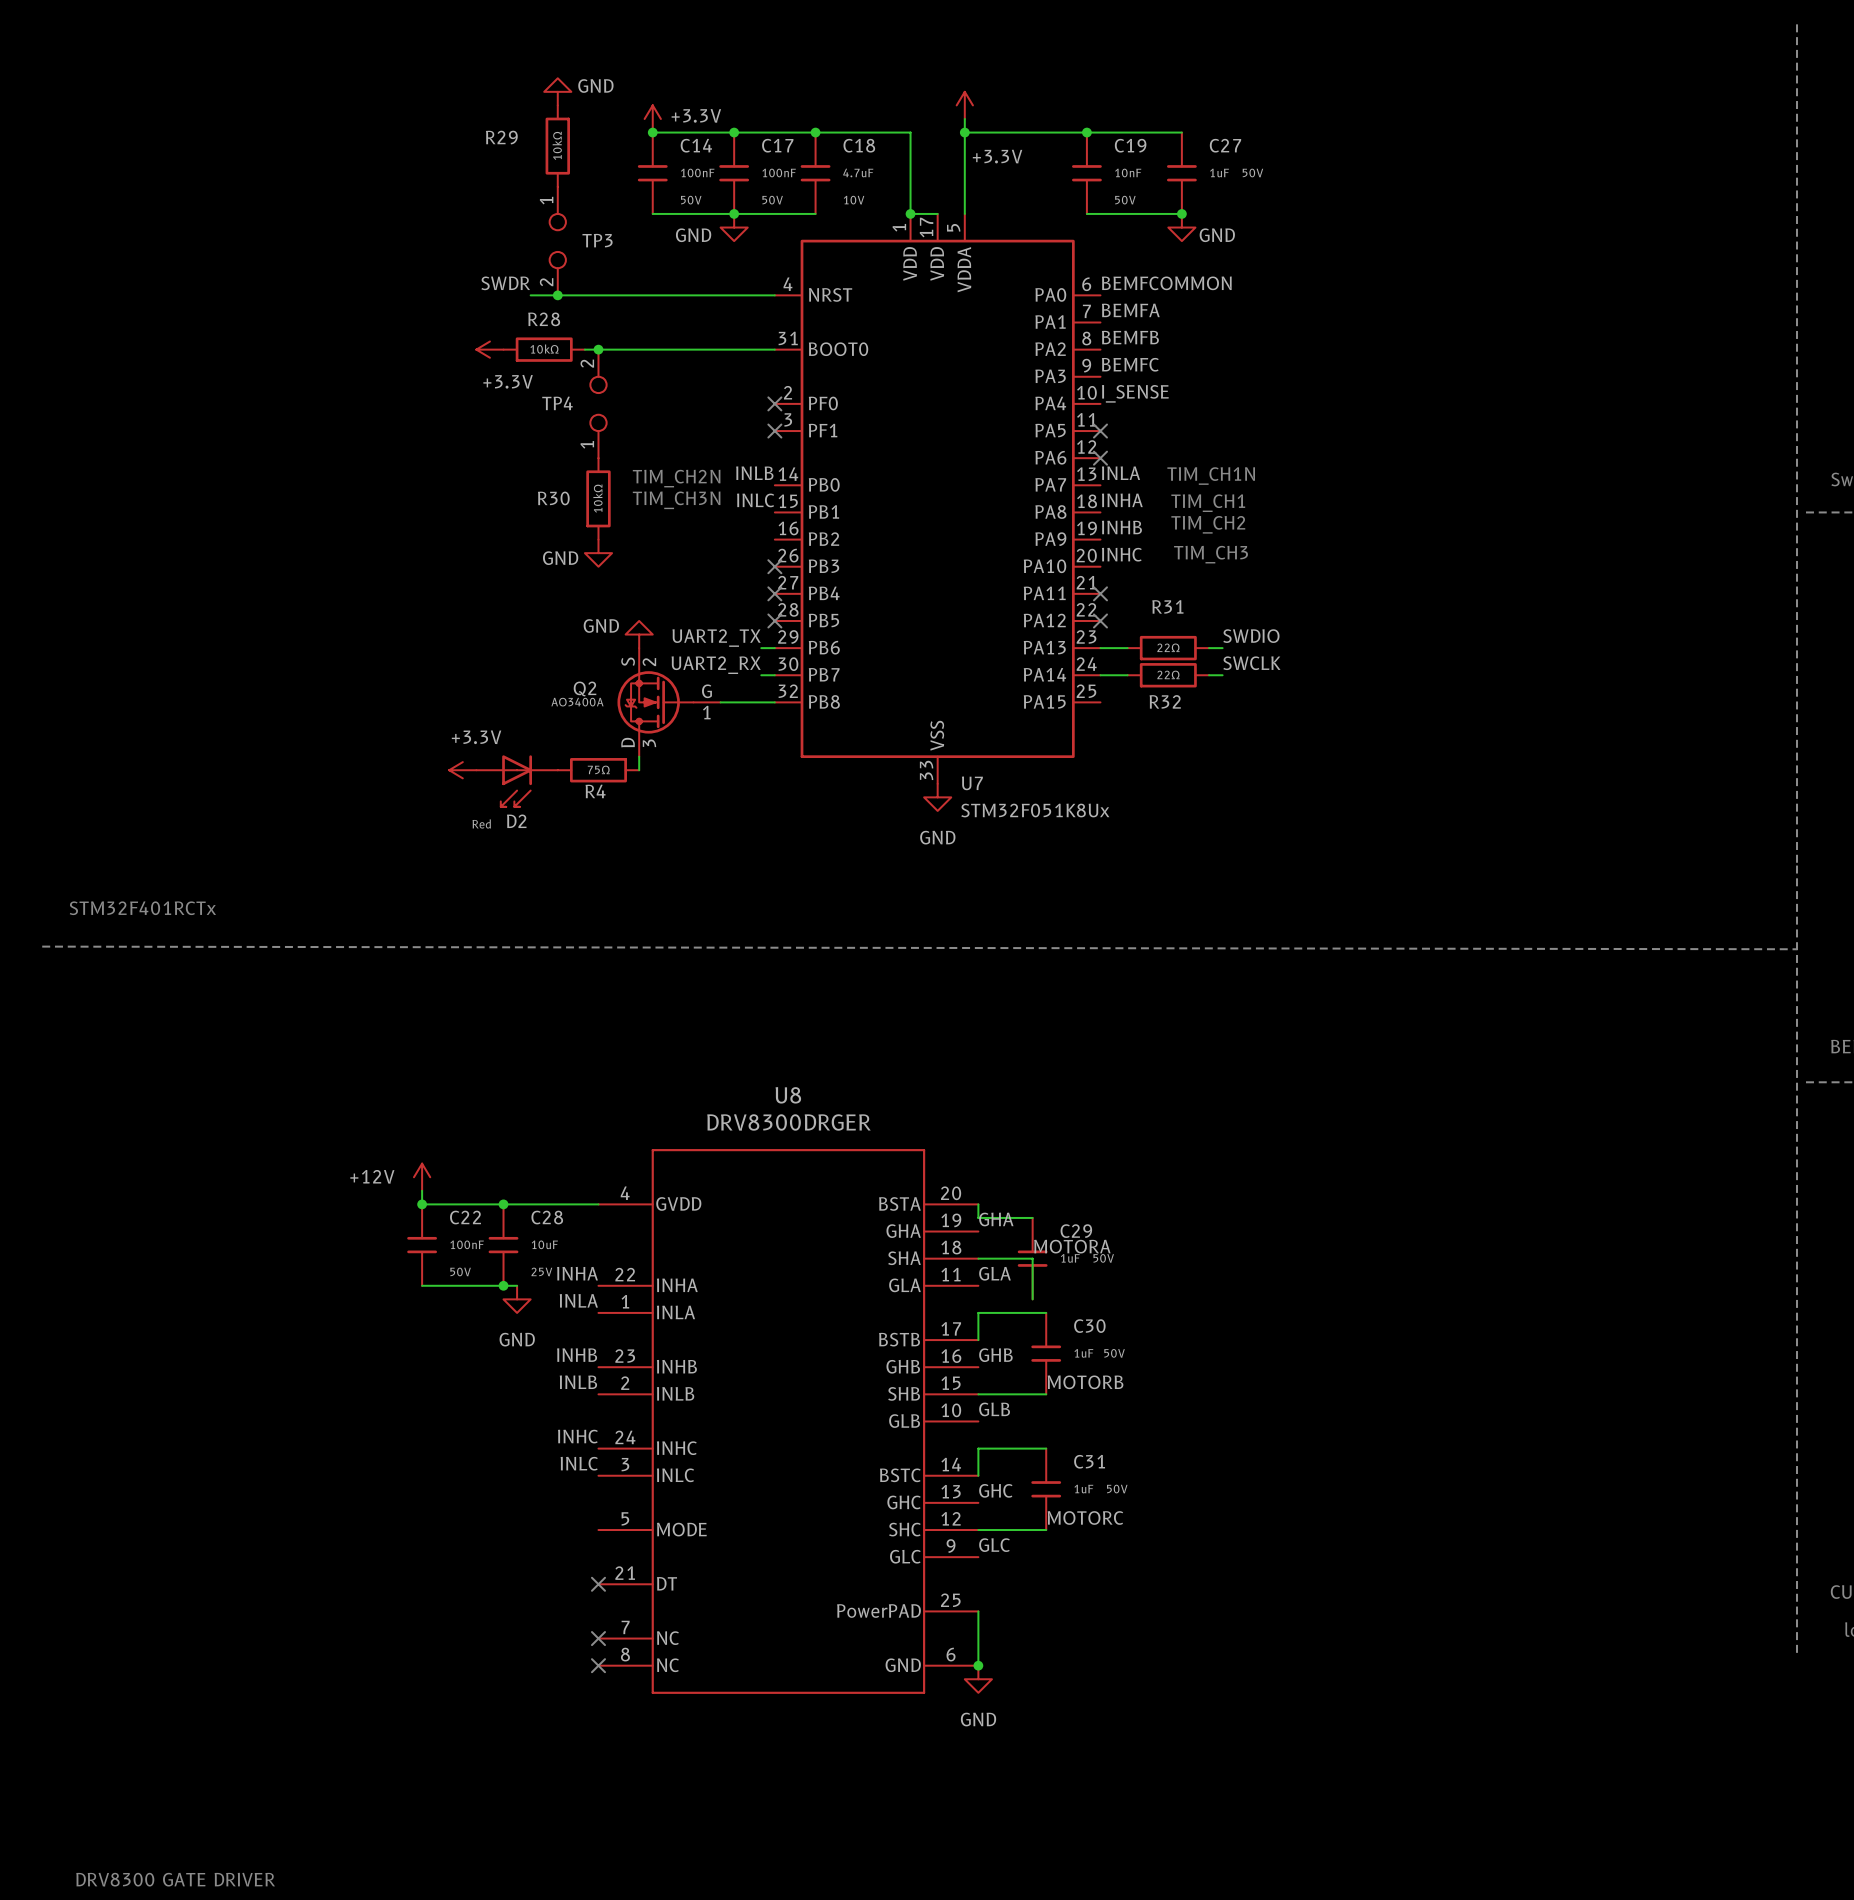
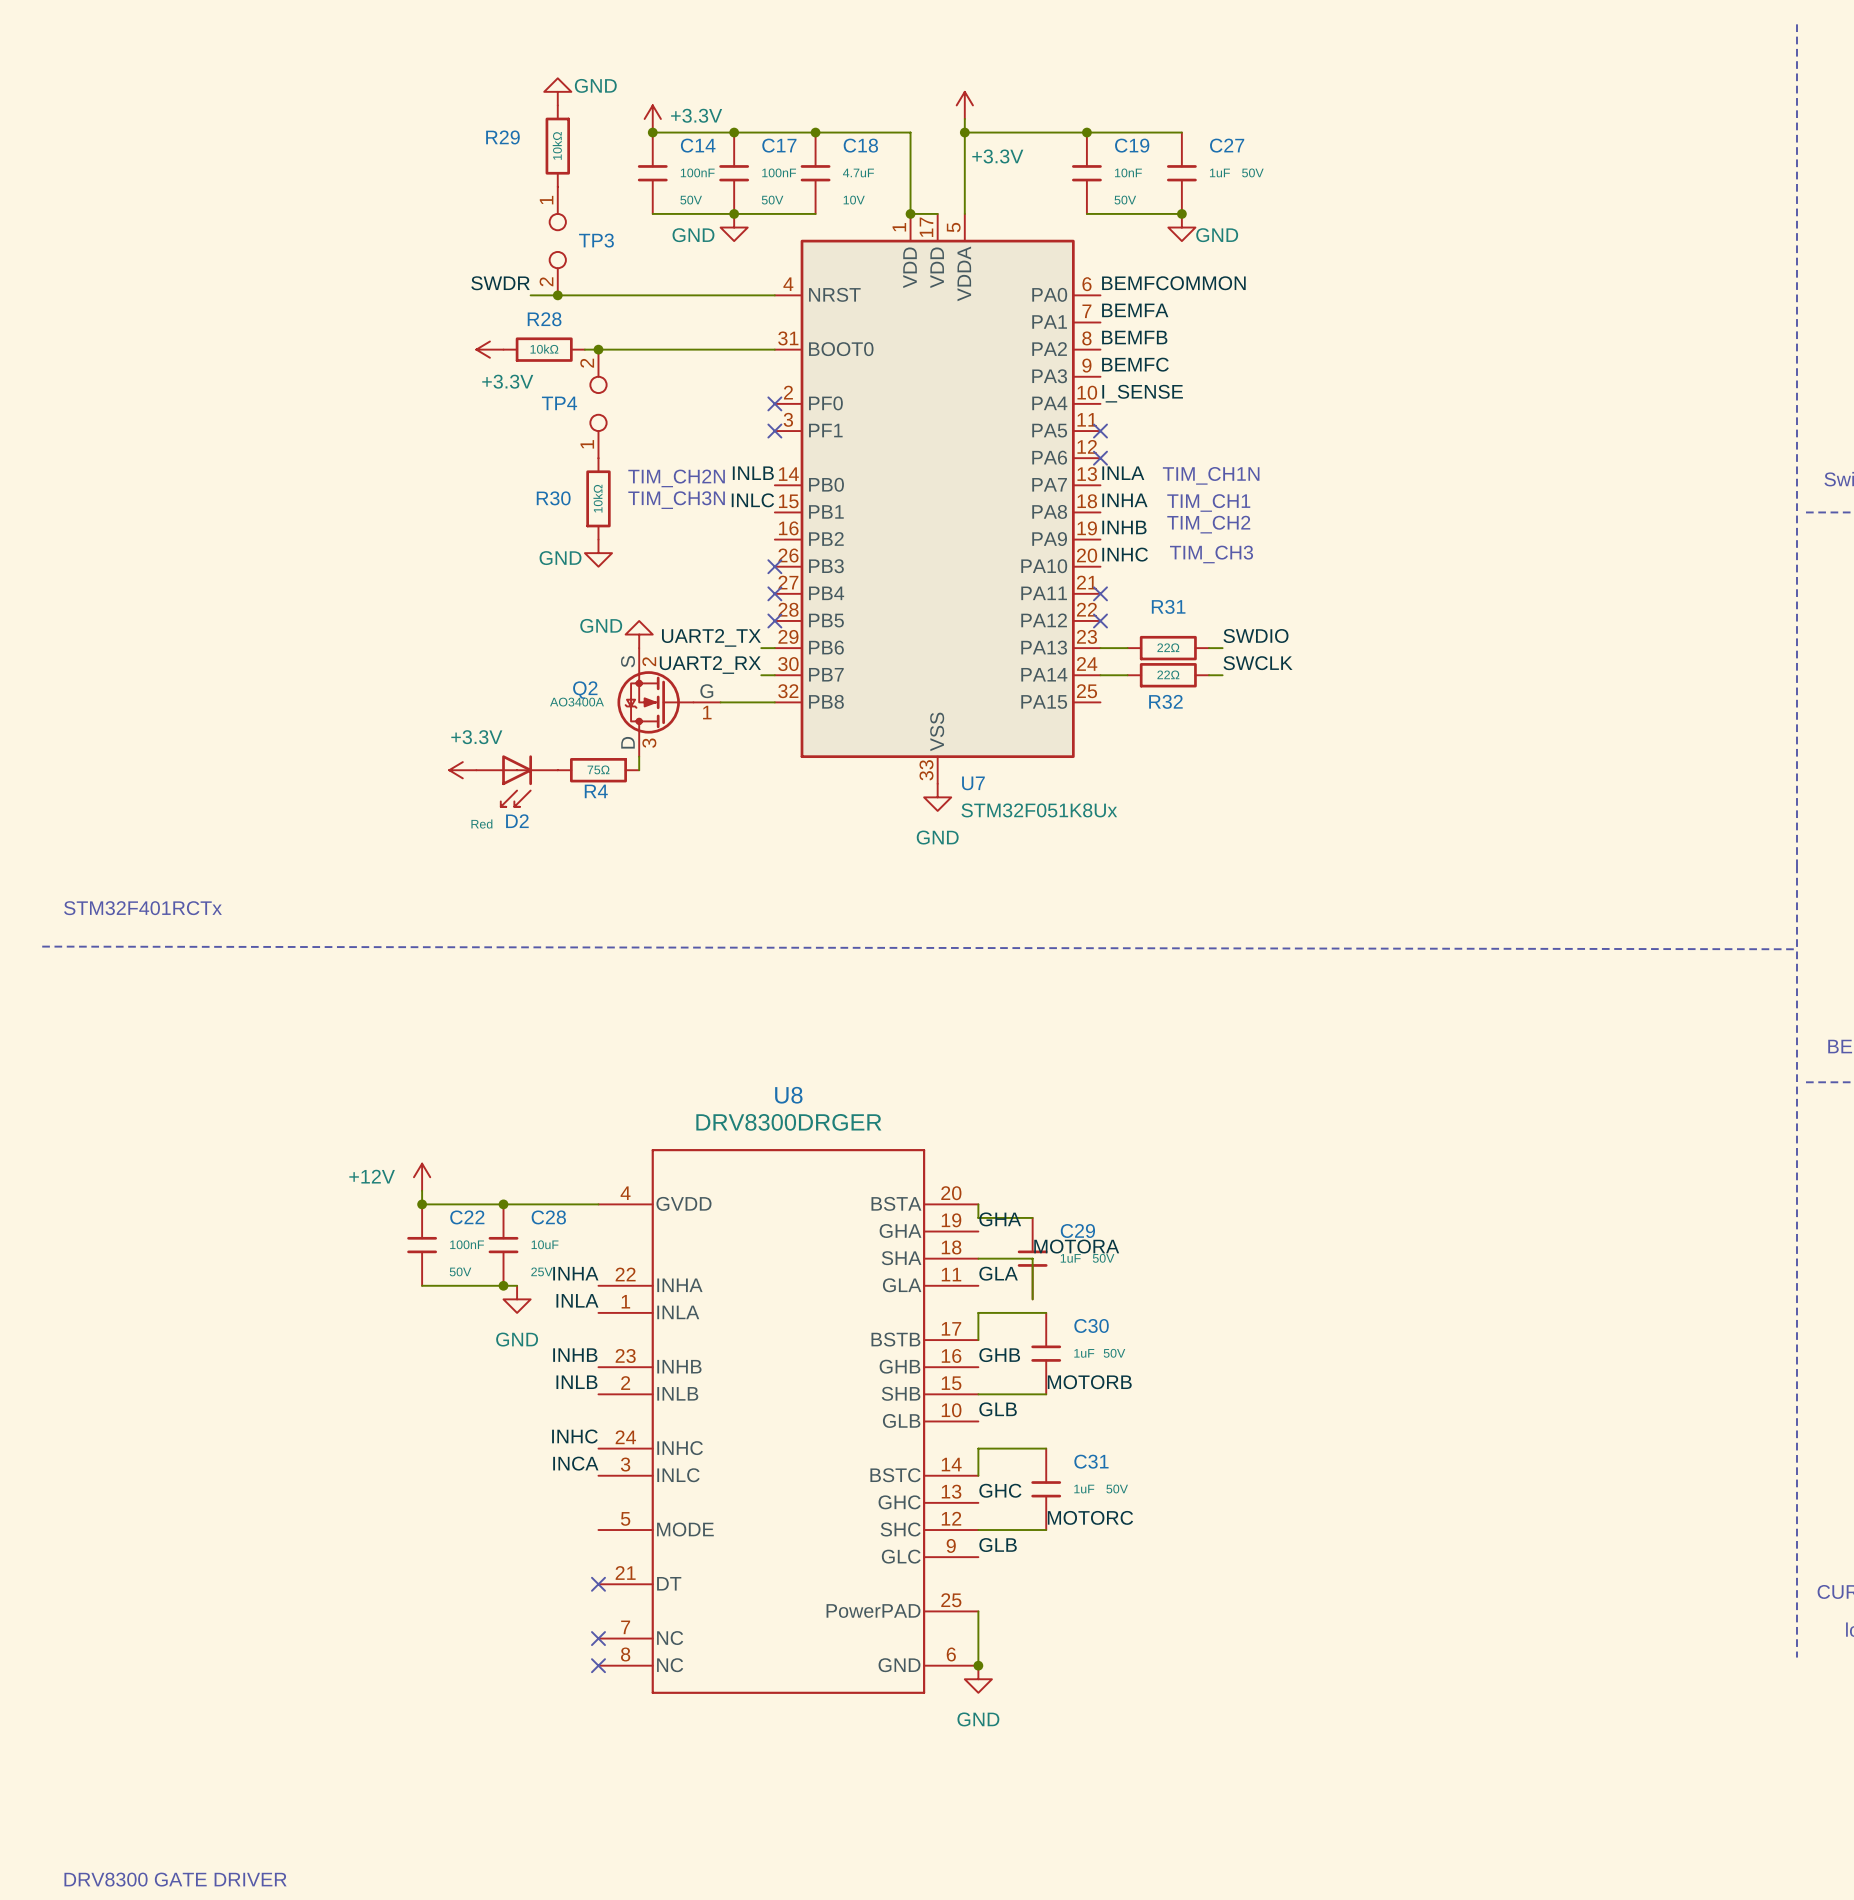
label: INLC (579, 1463) -> INCA (575, 1463)
label: GLC (994, 1545) -> GLB (998, 1545)

